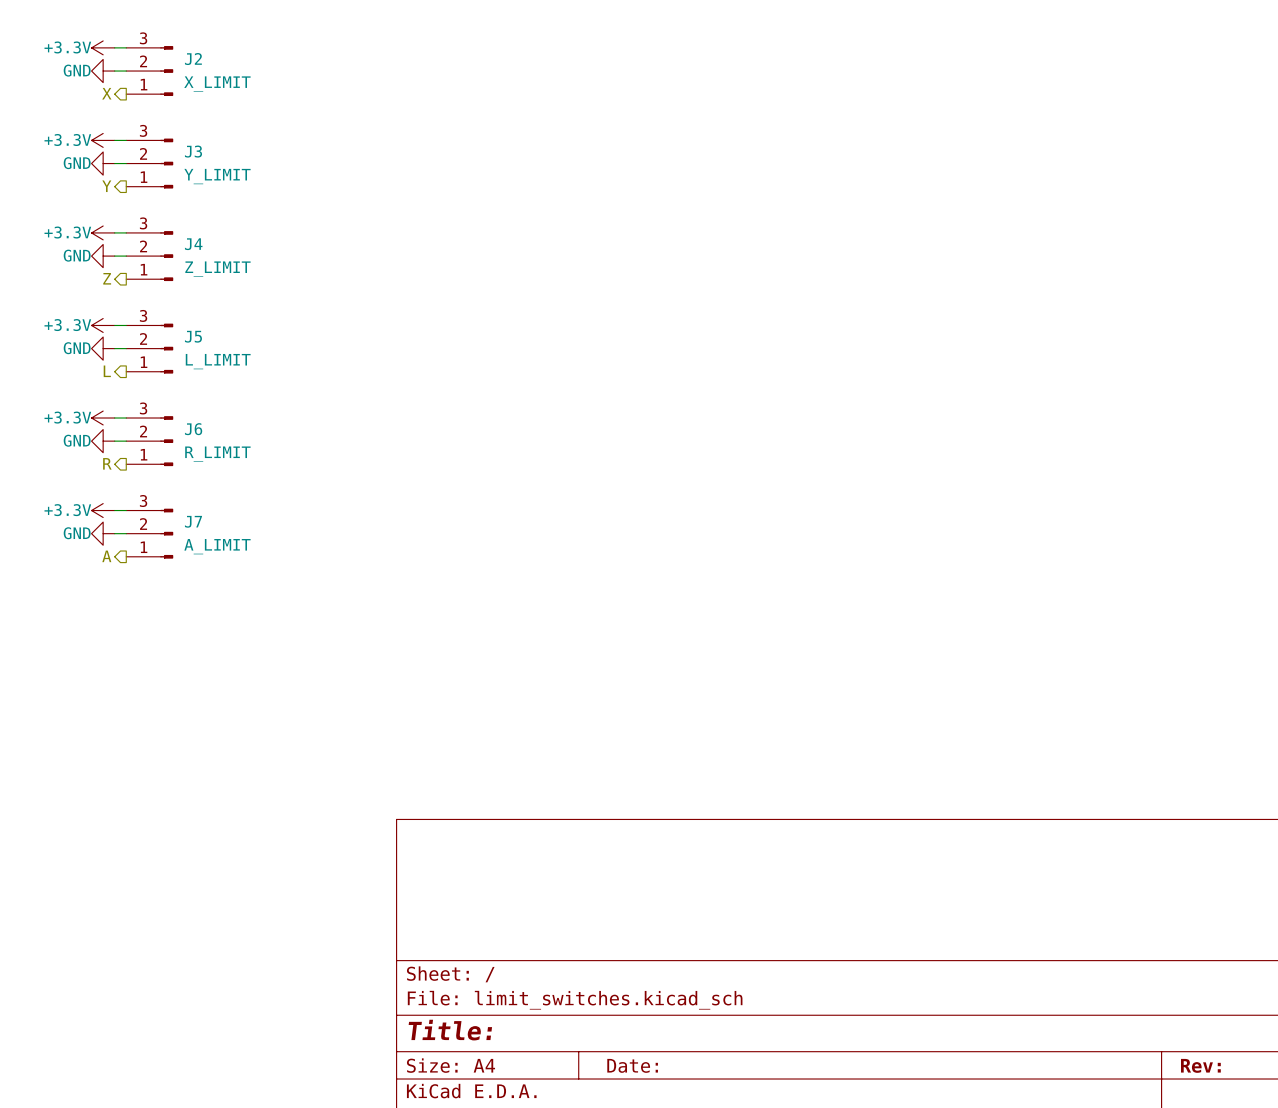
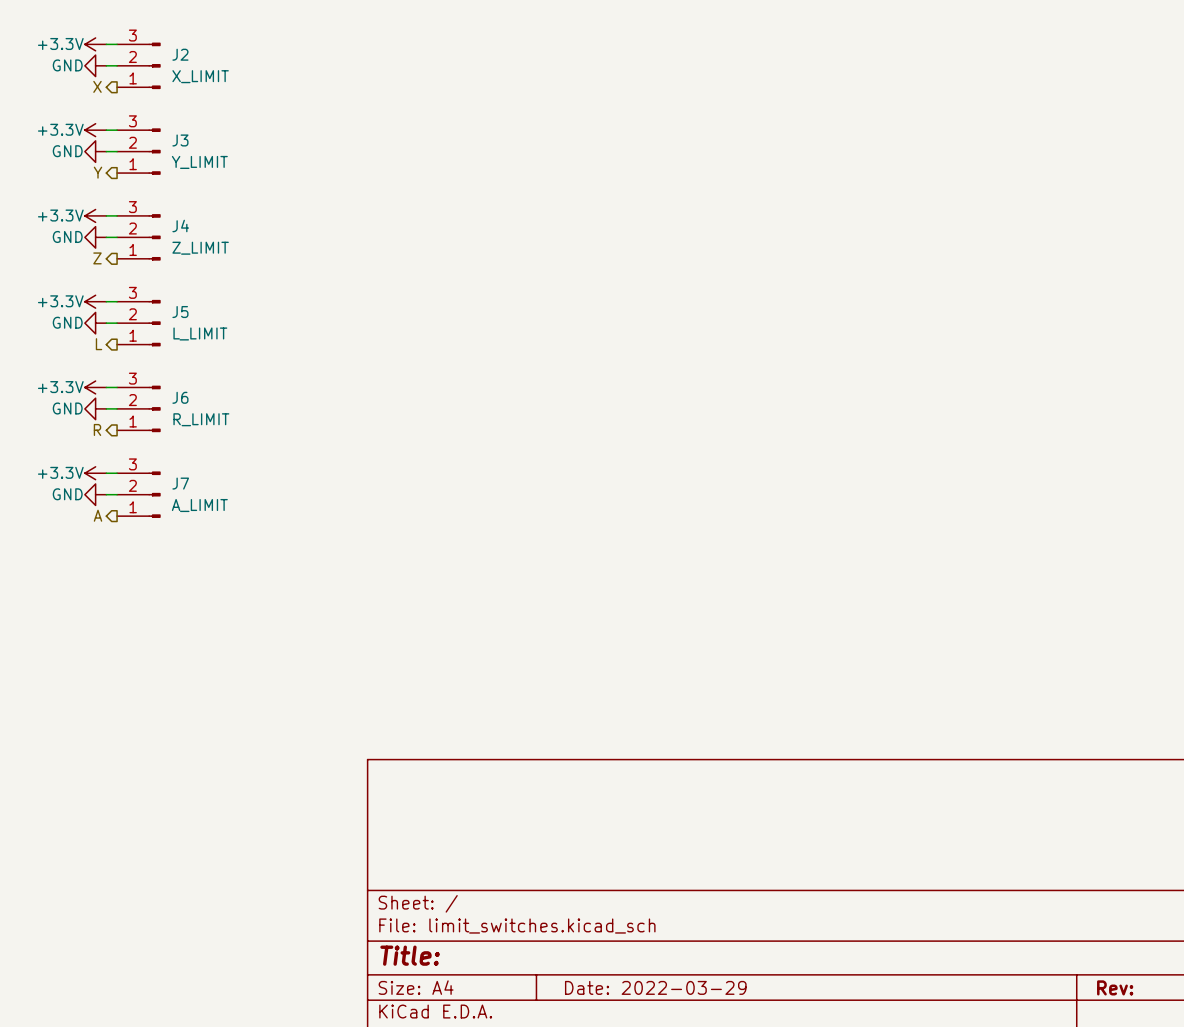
title block: Date: (632, 1065) -> Date: 2022-03-29 (655, 987)

